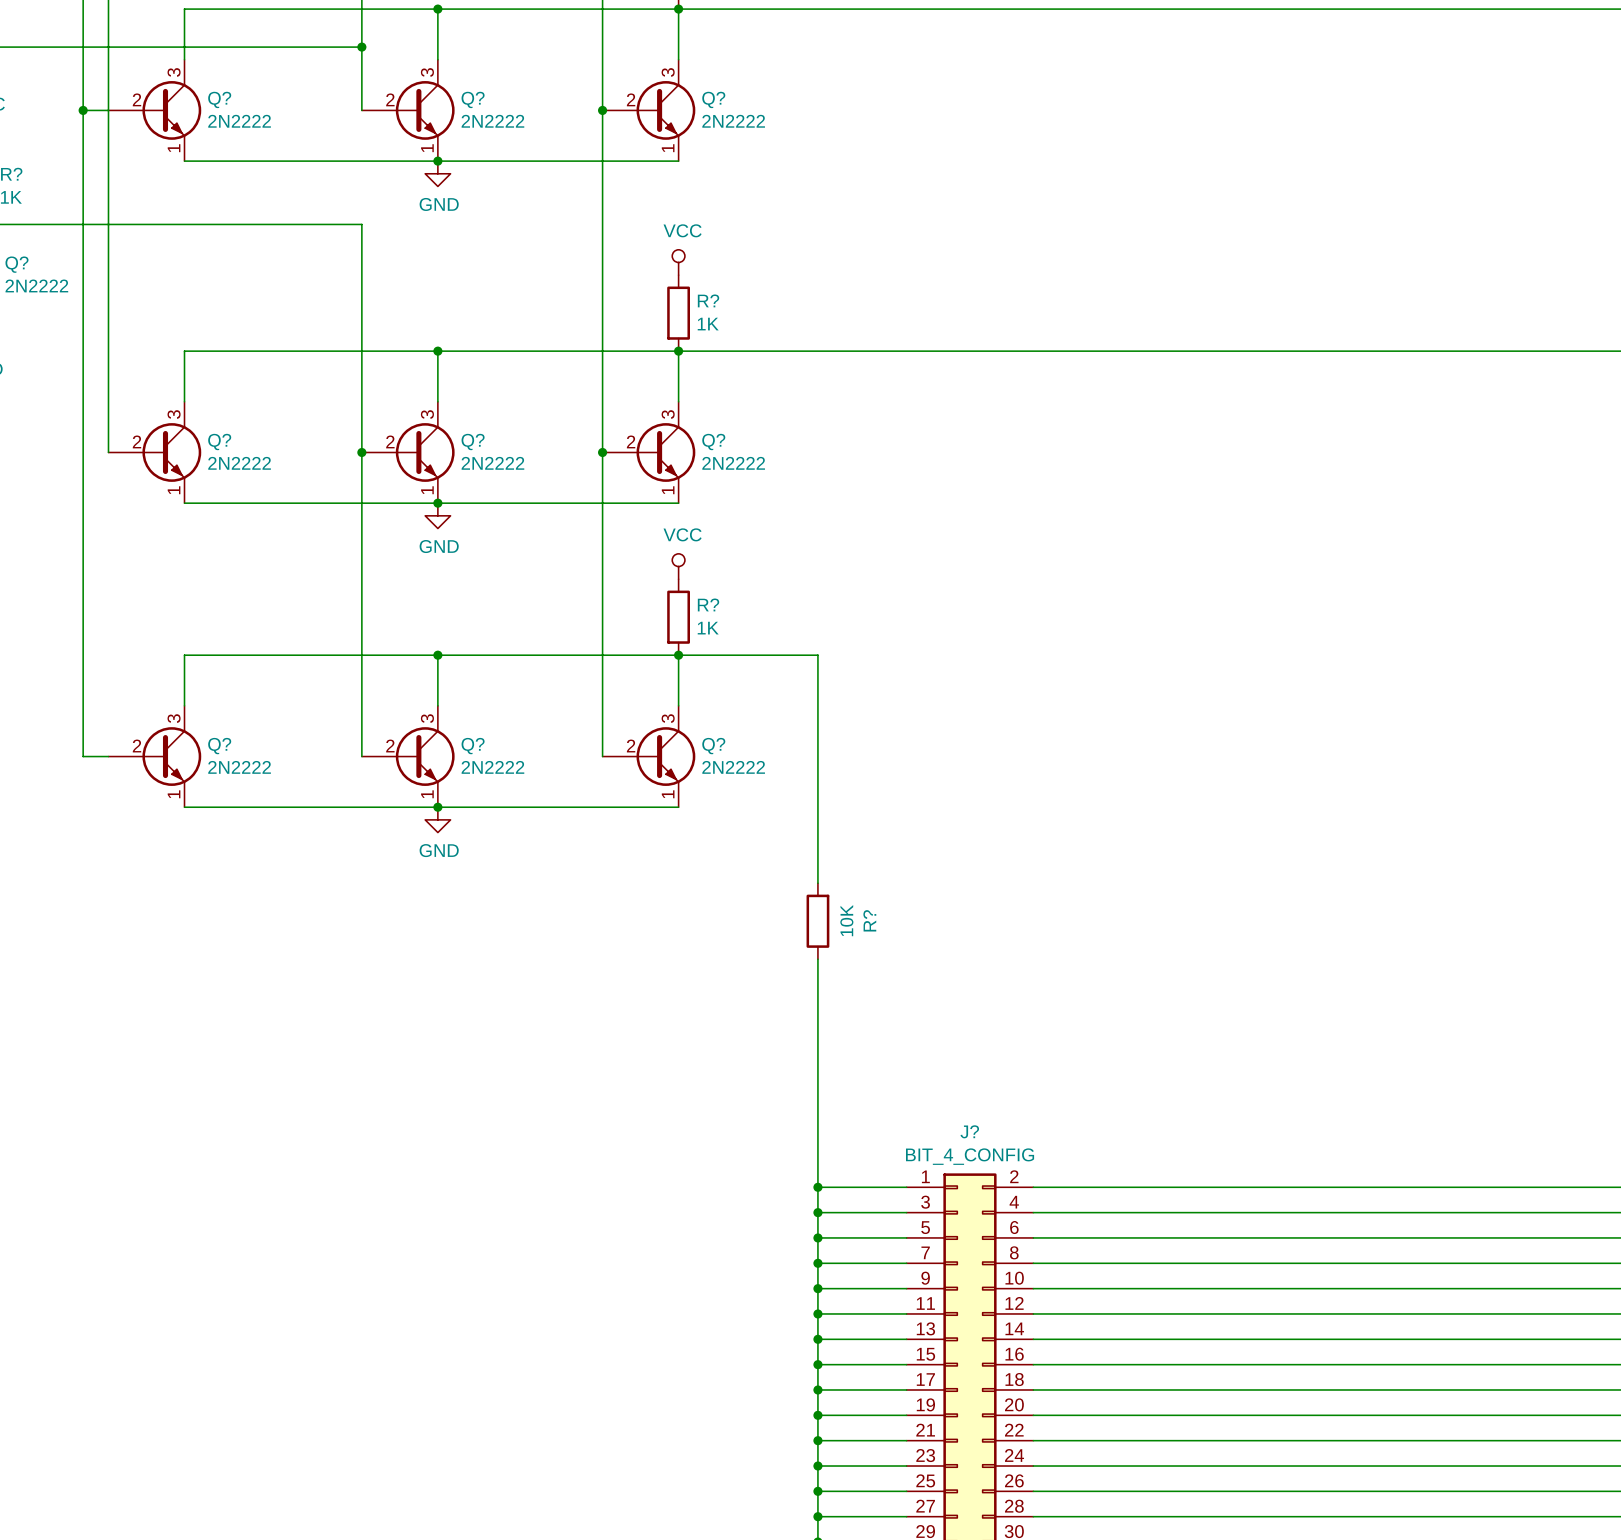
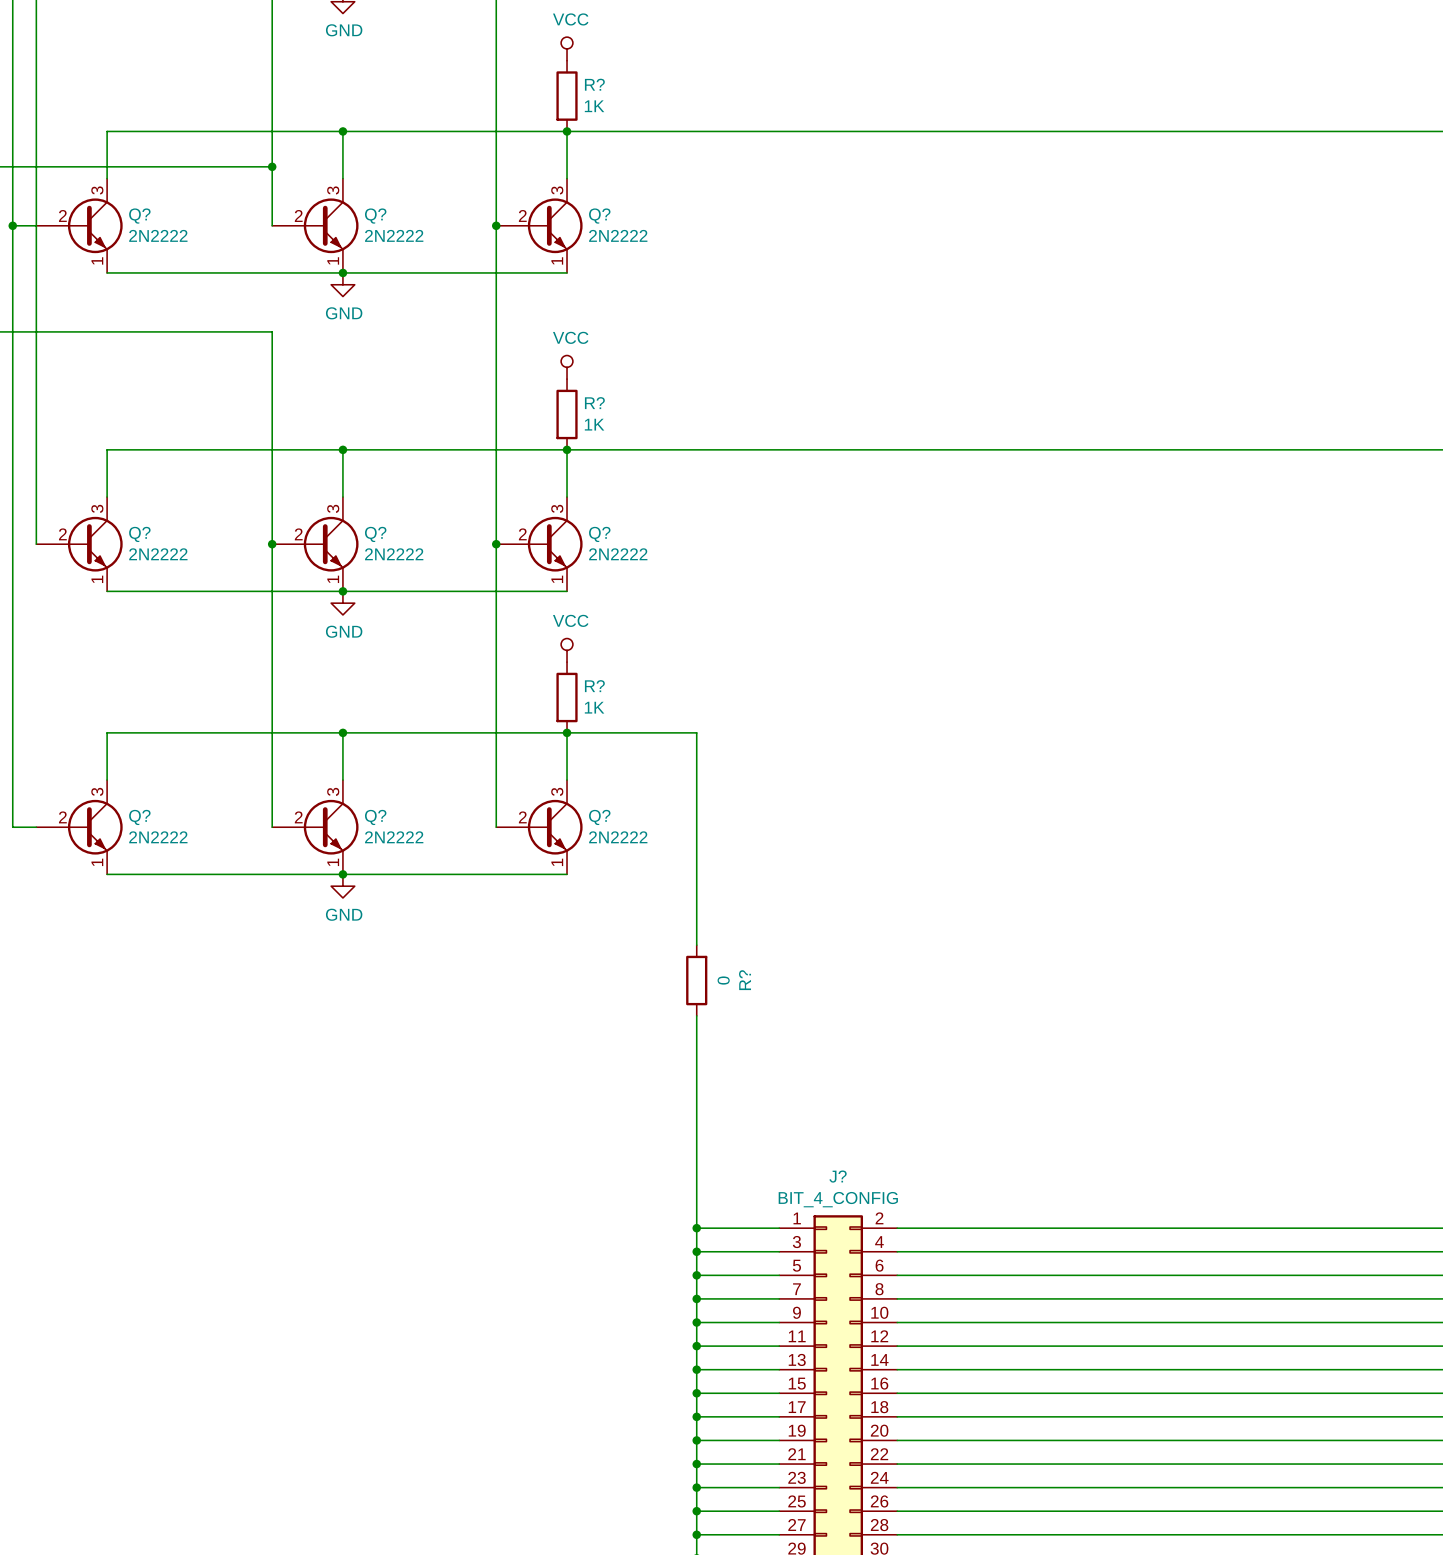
R? value: 10K (846, 920) -> 0 (723, 980)

